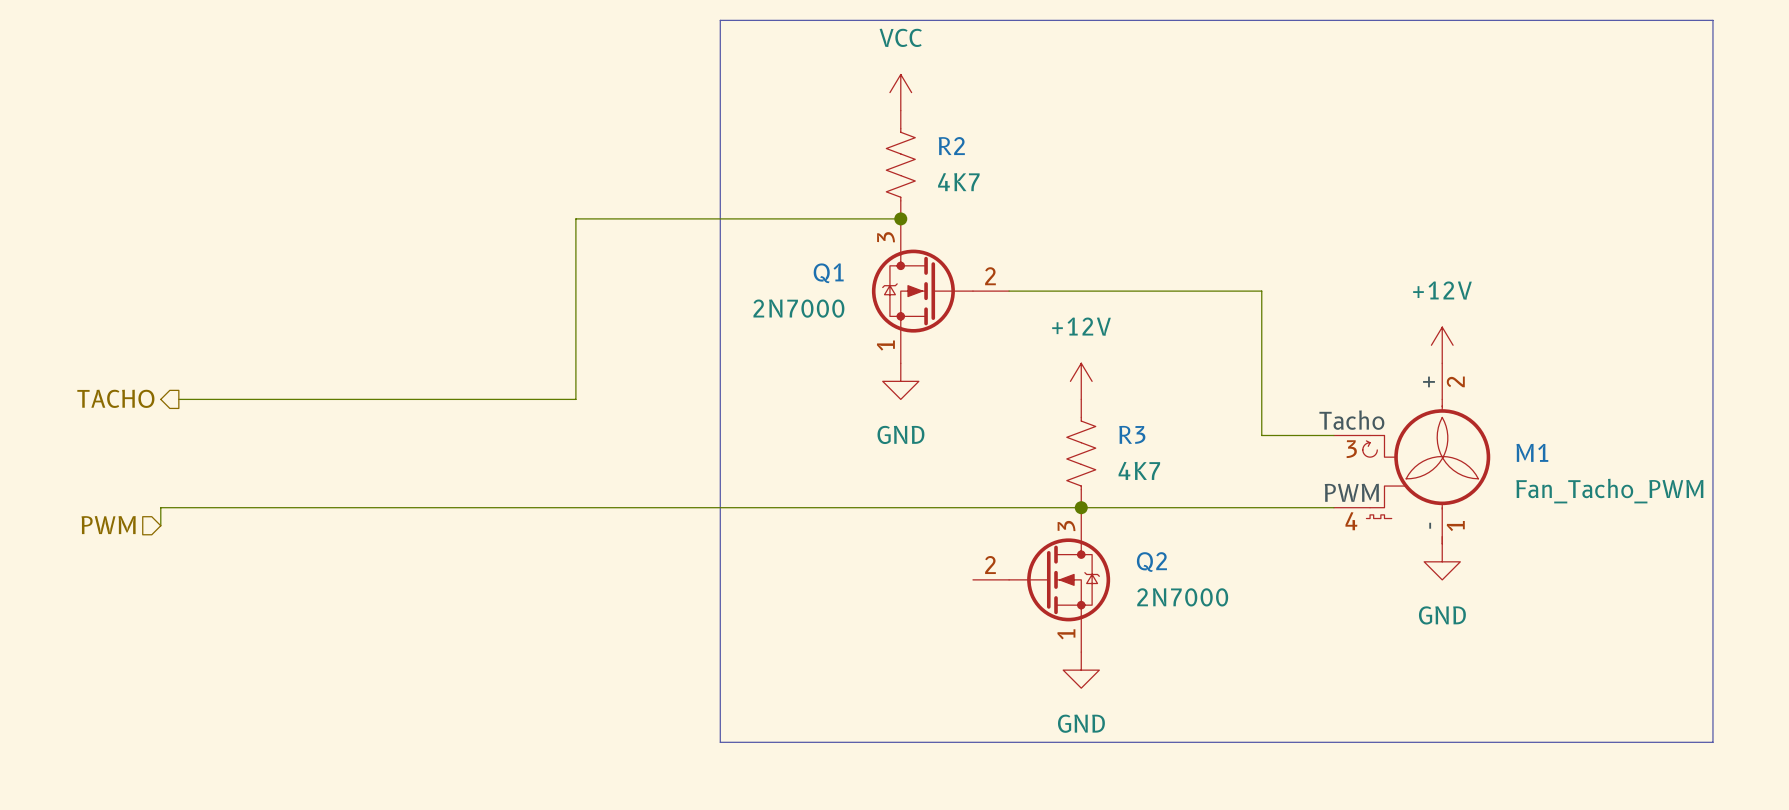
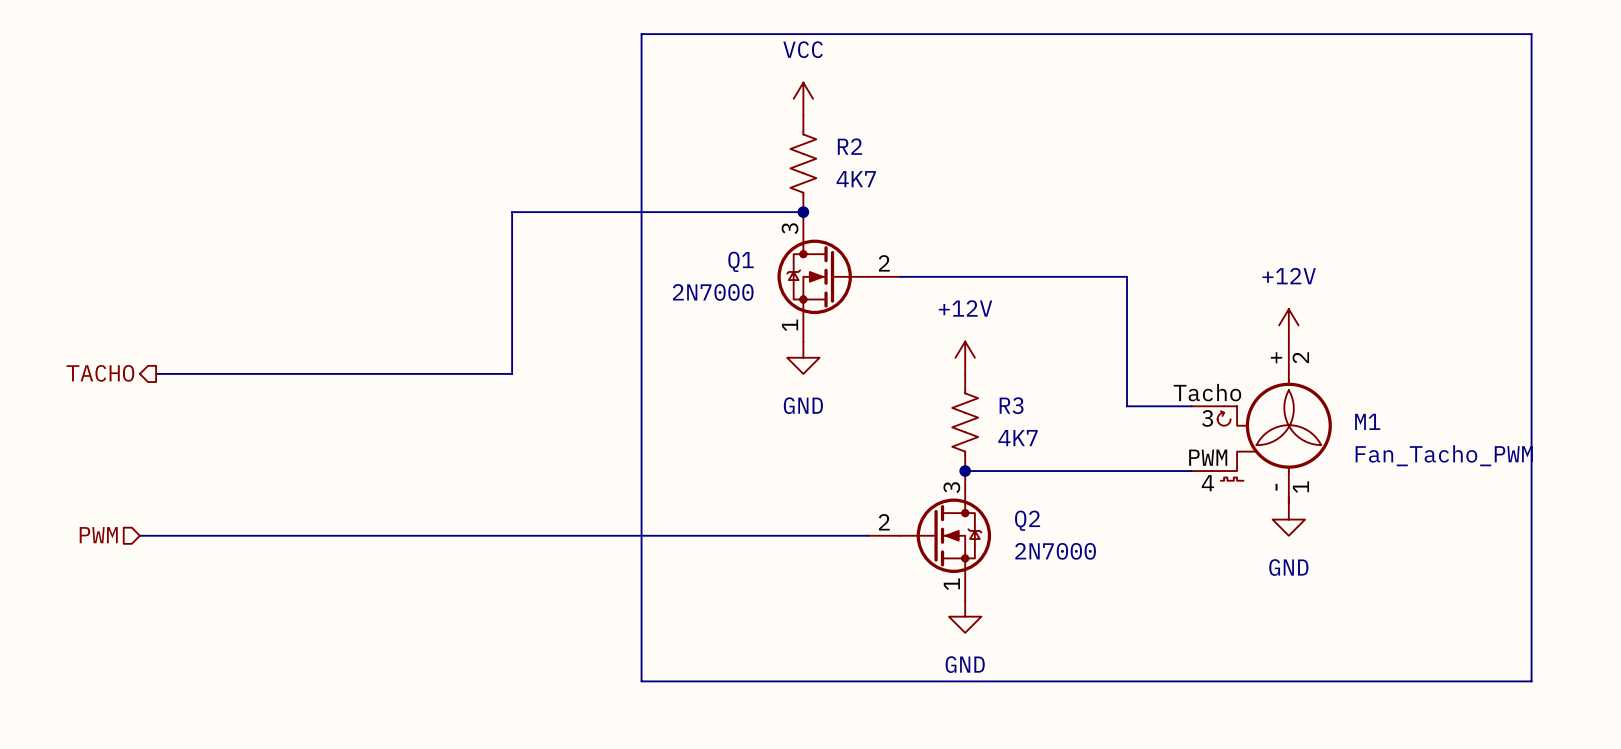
wire: (1081, 507) (160, 507) (160, 525) -> none
hierarchical label position: PWM (108, 525) -> PWM (98, 535)
wire: none -> (139, 535) (868, 535)

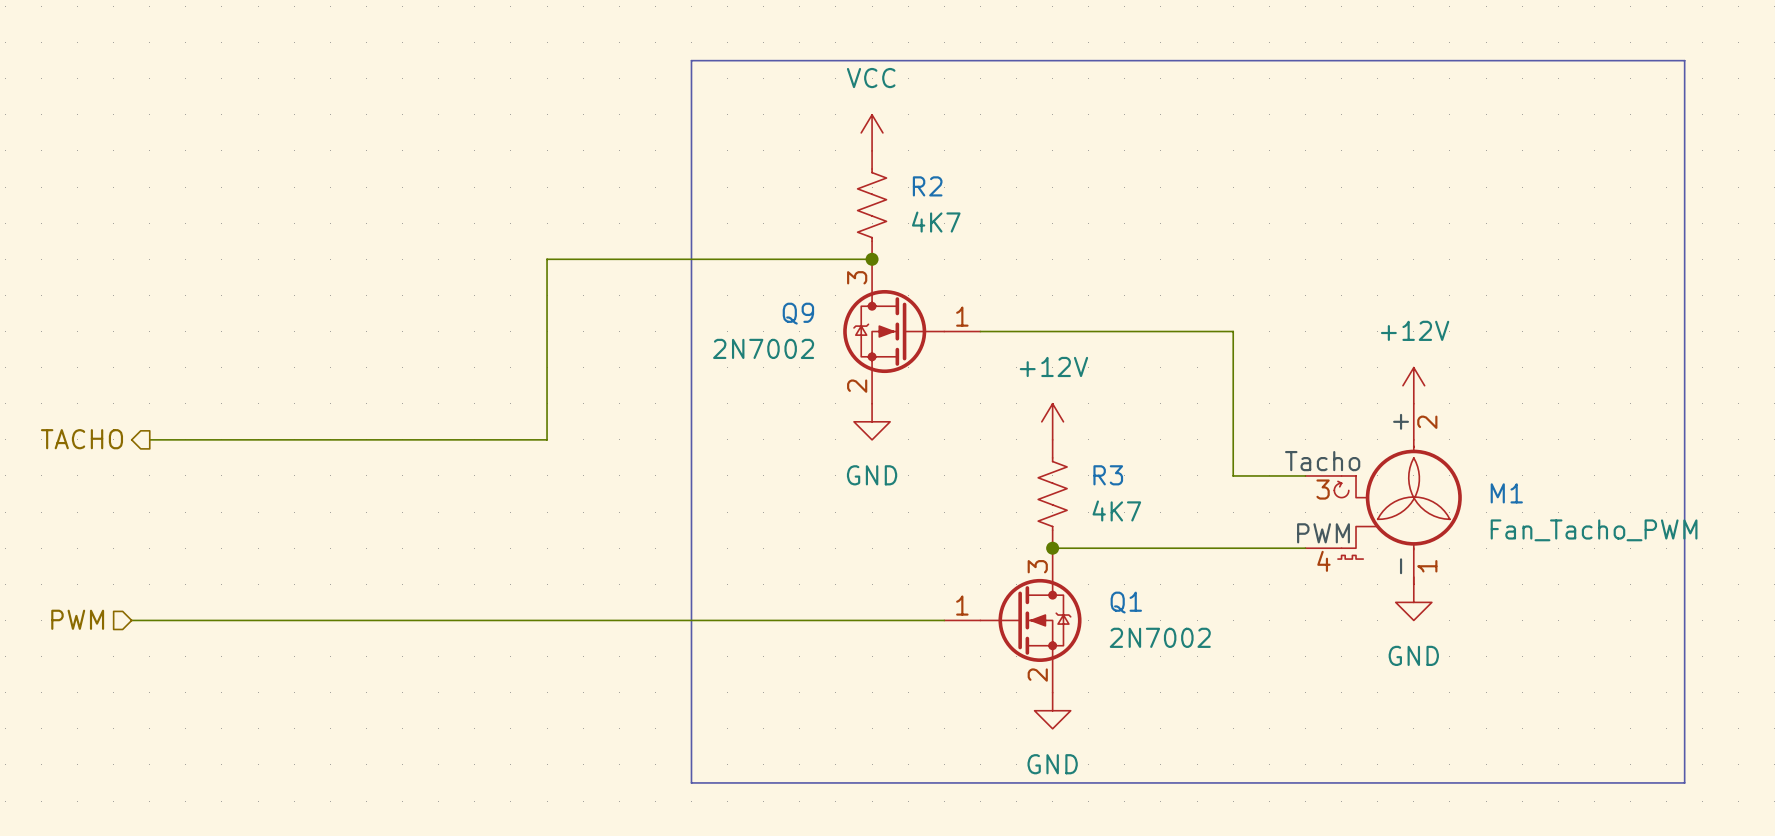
Q1 symbol: [777, 212, 901, 342] -> [944, 548, 1082, 693]
Q1 name position: Q1 (741, 261) -> Q1 (1126, 602)
Q9: none -> 2N7002 (911, 331)
Q1 value: 2N7000 (713, 292) -> 2N7002 (1160, 637)
Q2: 2N7000 (929, 535) -> none

